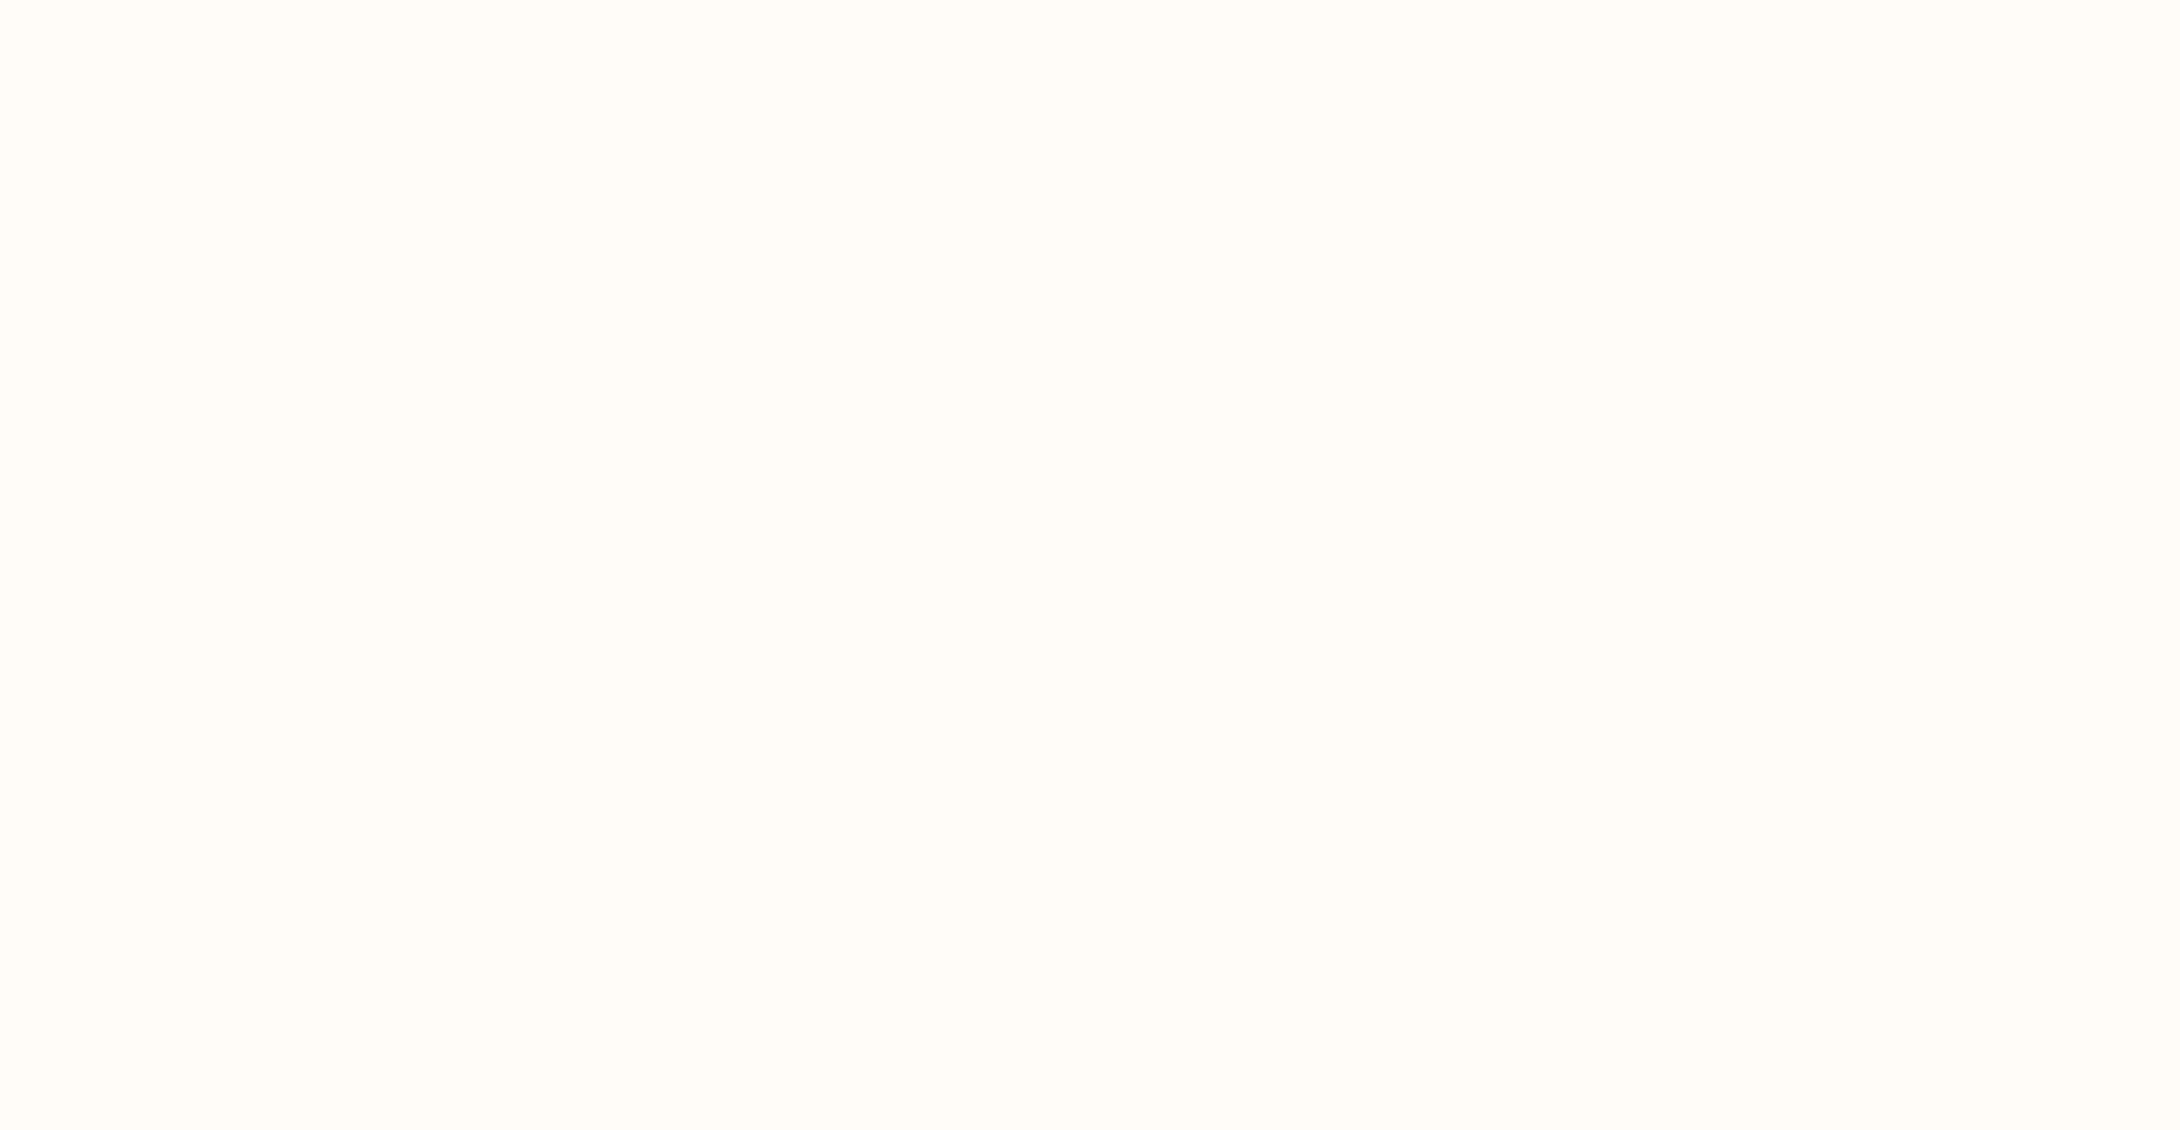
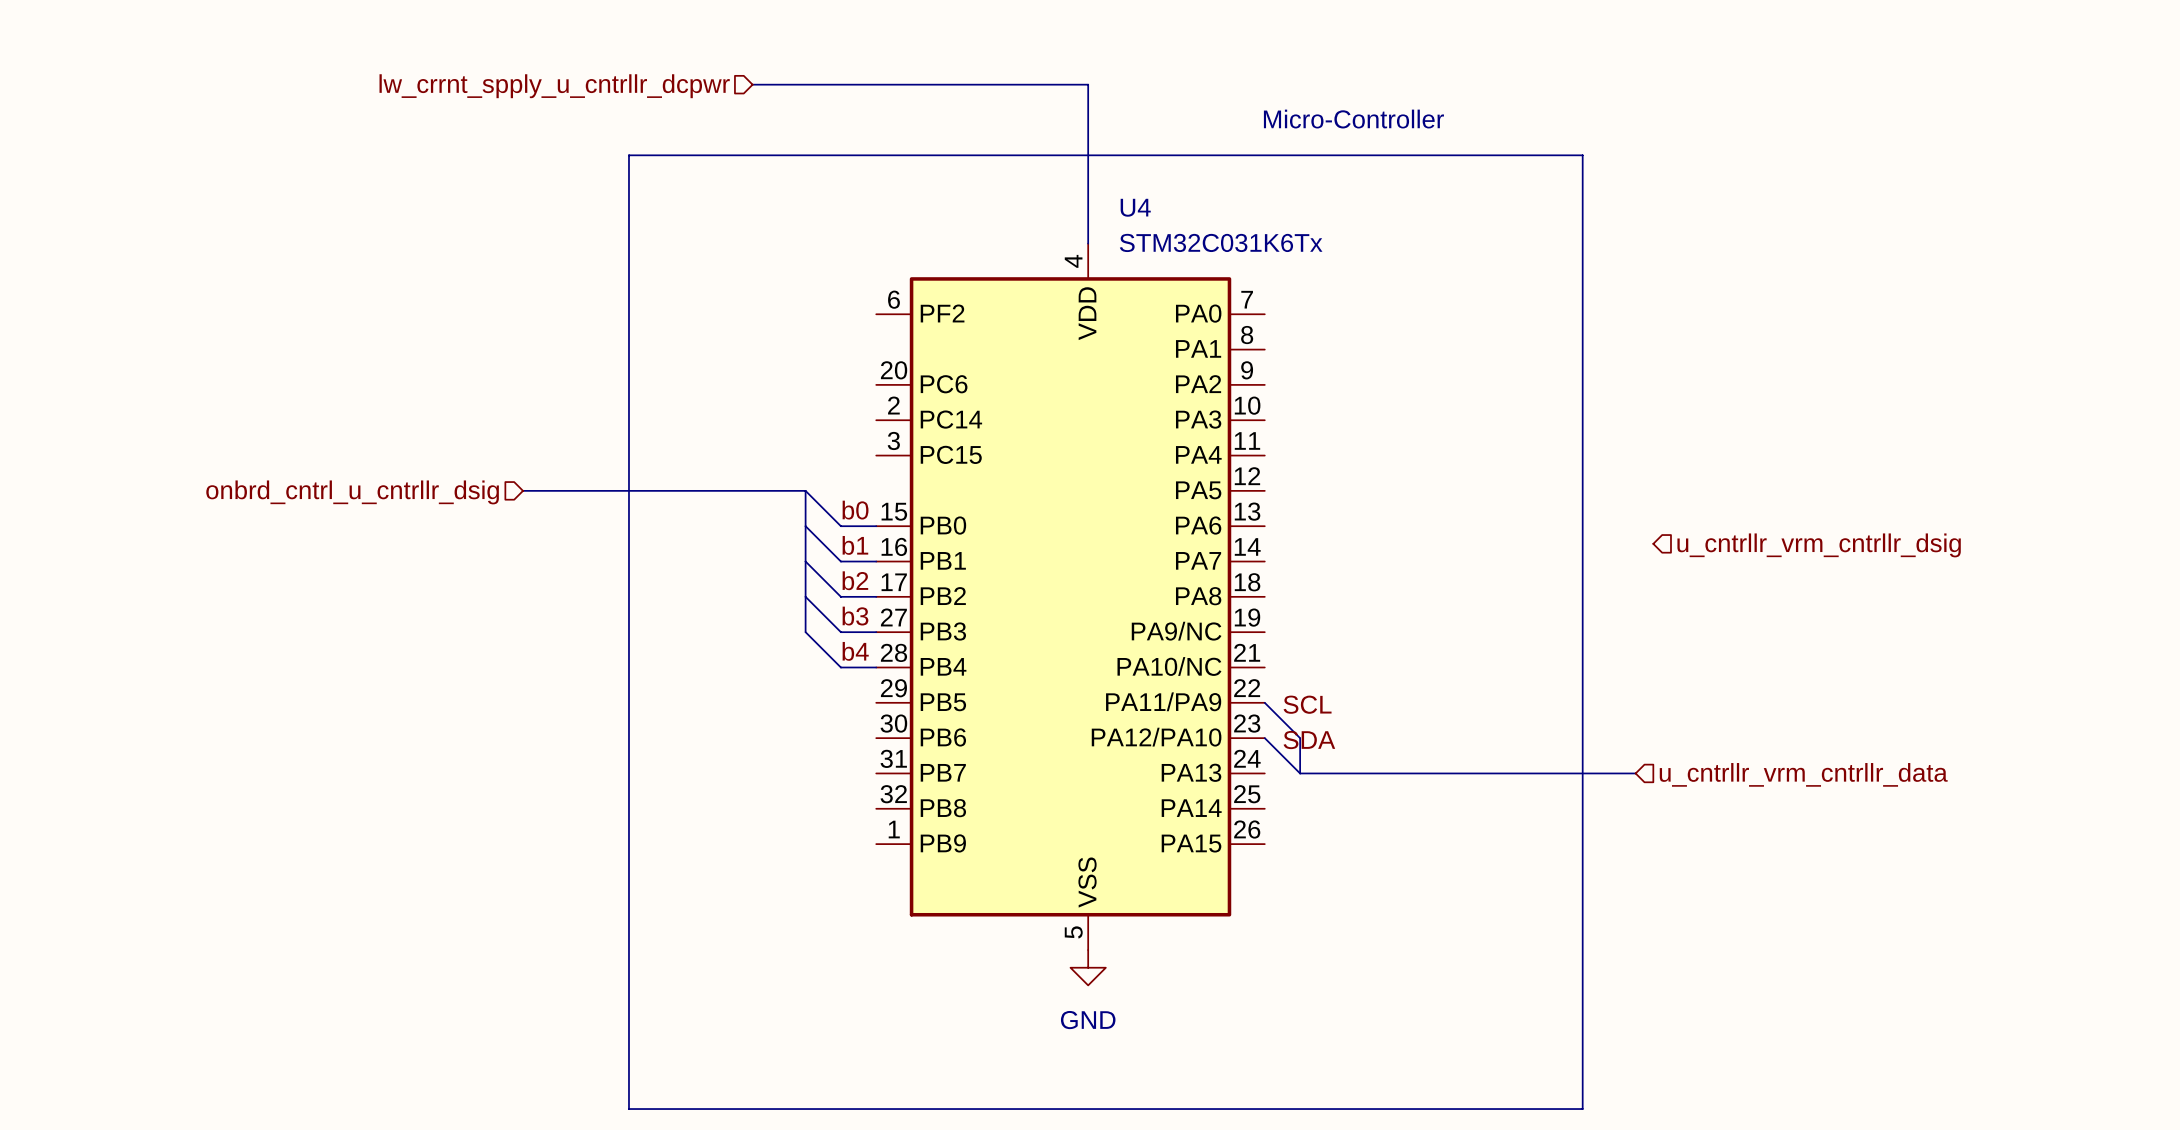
wire: none -> (752, 84) (1088, 84) (1088, 243)
hierarchical label: none -> lw_crrnt_spply_u_cntrllr_dcpwr (554, 86)
text: none -> Micro-Controller (1353, 119)
line: none -> (628, 155) (1582, 155) (1582, 1109) (628, 1109) (628, 155)
bus: none -> (523, 490) (805, 490) (805, 632)
wire: none -> (805, 490) (840, 526) (876, 526)
hierarchical label: none -> onbrd_cntrl_u_cntrllr_dsig (352, 492)
label: none -> b0 (855, 510)
wire: none -> (805, 526) (840, 561) (876, 561)
label: none -> b1 (855, 545)
hierarchical label: none -> u_cntrllr_vrm_cntrllr_dsig (1819, 545)
wire: none -> (805, 561) (840, 596) (876, 596)
label: none -> b2 (855, 580)
wire: none -> (805, 596) (840, 632) (876, 632)
U4: none -> STM32C031K6Tx (1070, 596)
label: none -> b3 (855, 616)
wire: none -> (805, 632) (840, 667) (876, 667)
label: none -> b4 (855, 651)
wire: none -> (1264, 702) (1300, 738)
label: none -> SCL (1307, 704)
wire: none -> (1264, 738) (1300, 773)
bus: none -> (1300, 738) (1300, 773) (1635, 773)
label: none -> SDA (1309, 740)
hierarchical label: none -> u_cntrllr_vrm_cntrllr_data (1803, 774)
power symbol: none -> GND (1088, 967)

